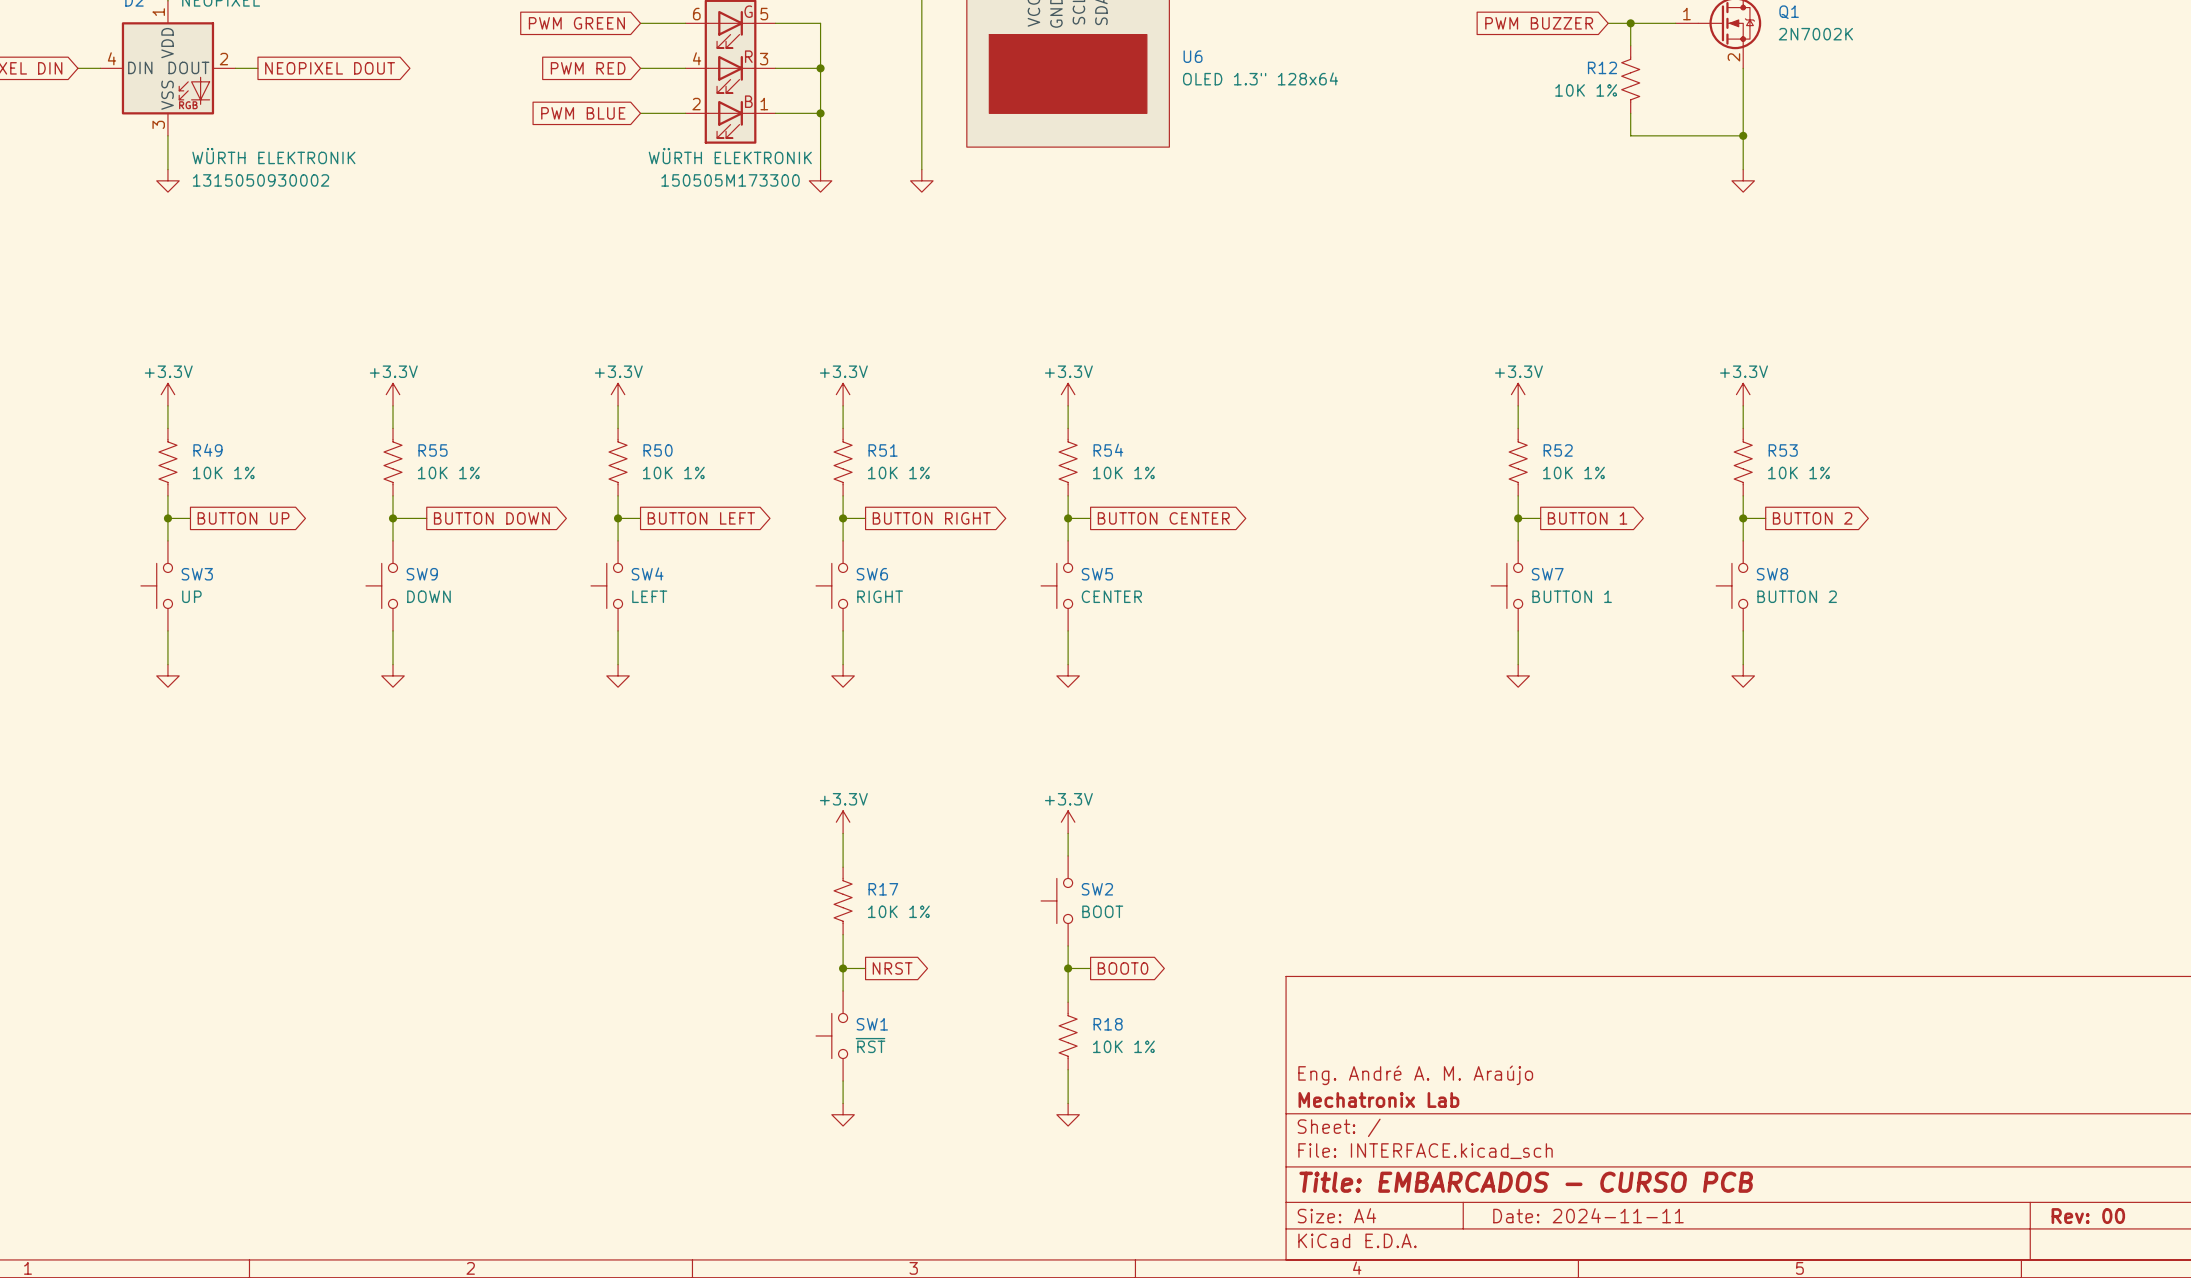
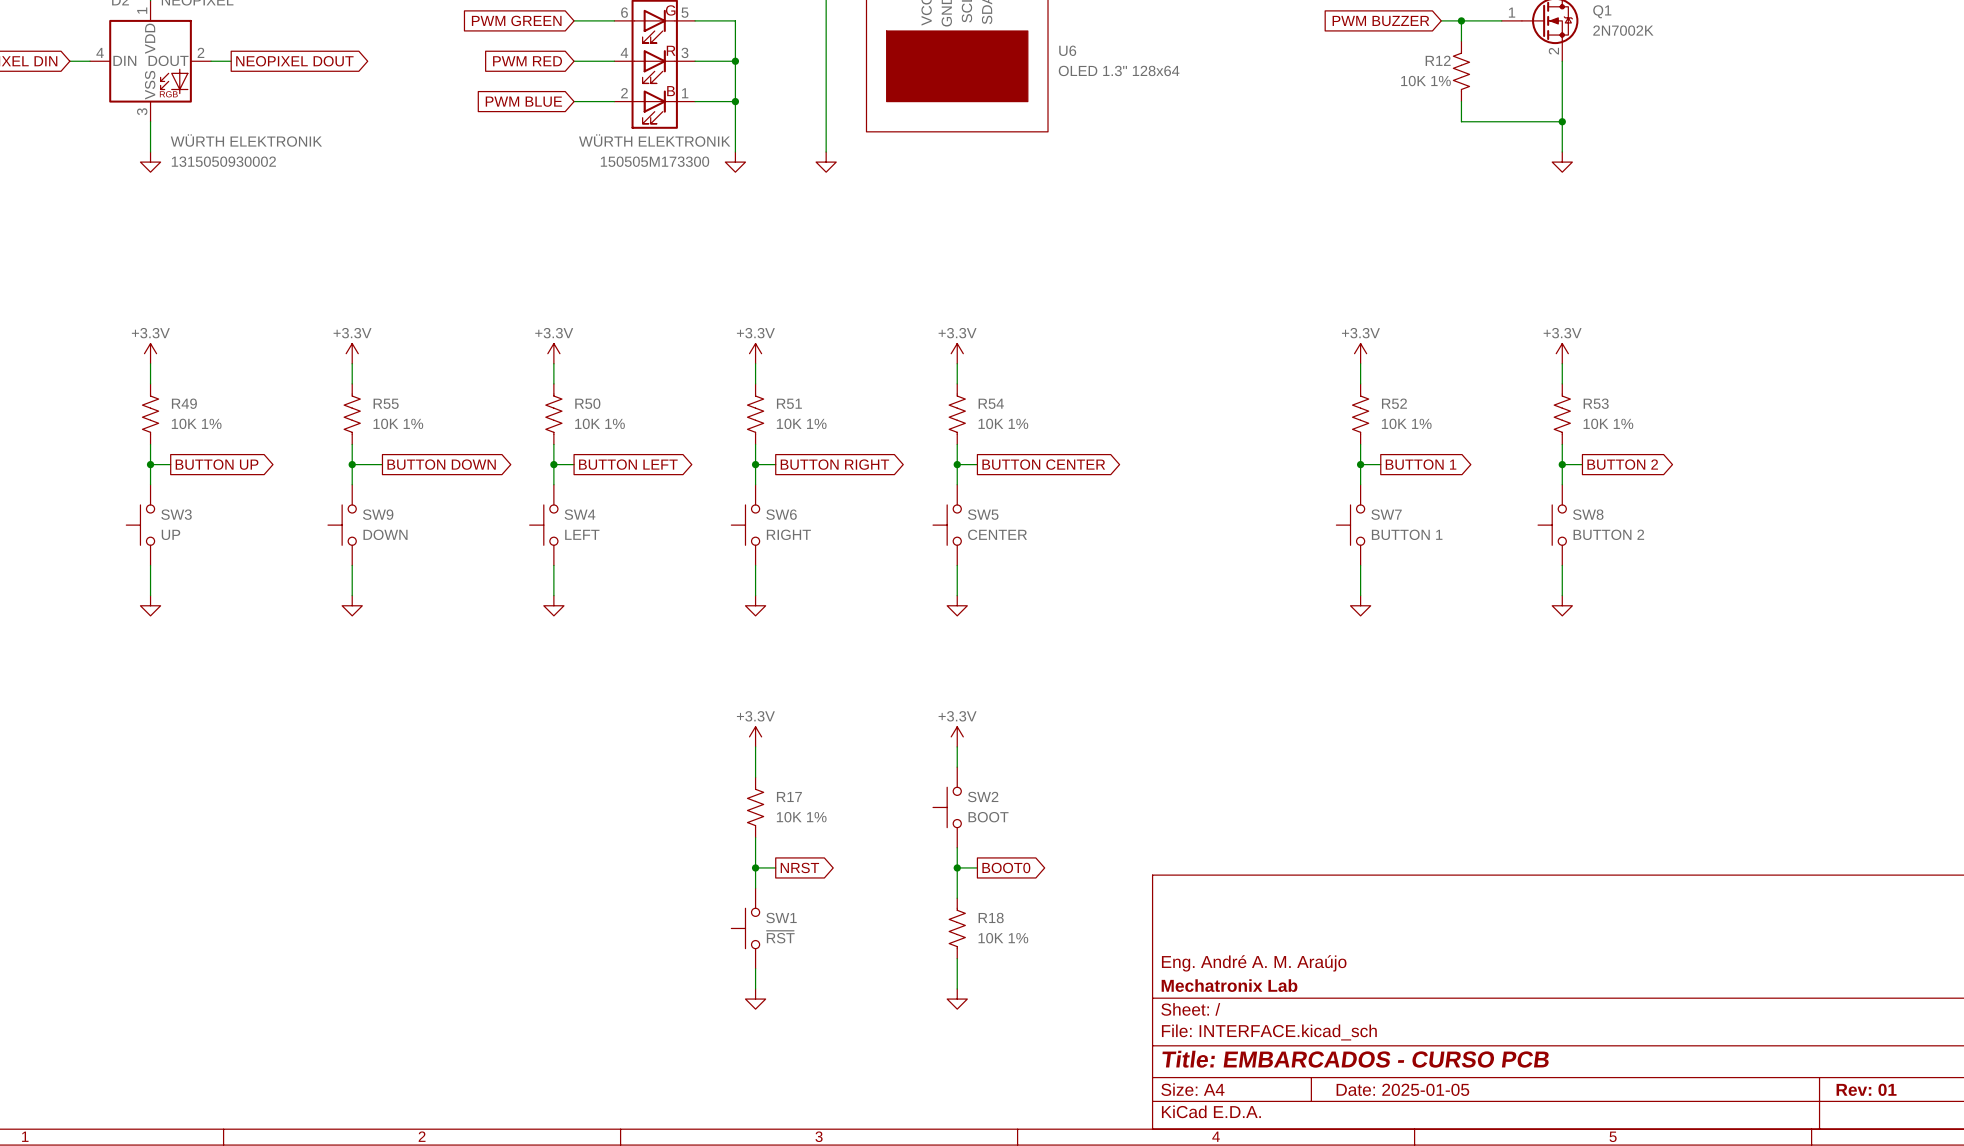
title block: Date: 2024-11-11 (1588, 1215) -> Date: 2025-01-05 (1402, 1089)
title block: Rev: 00 (2088, 1216) -> Rev: 01 (1866, 1089)

